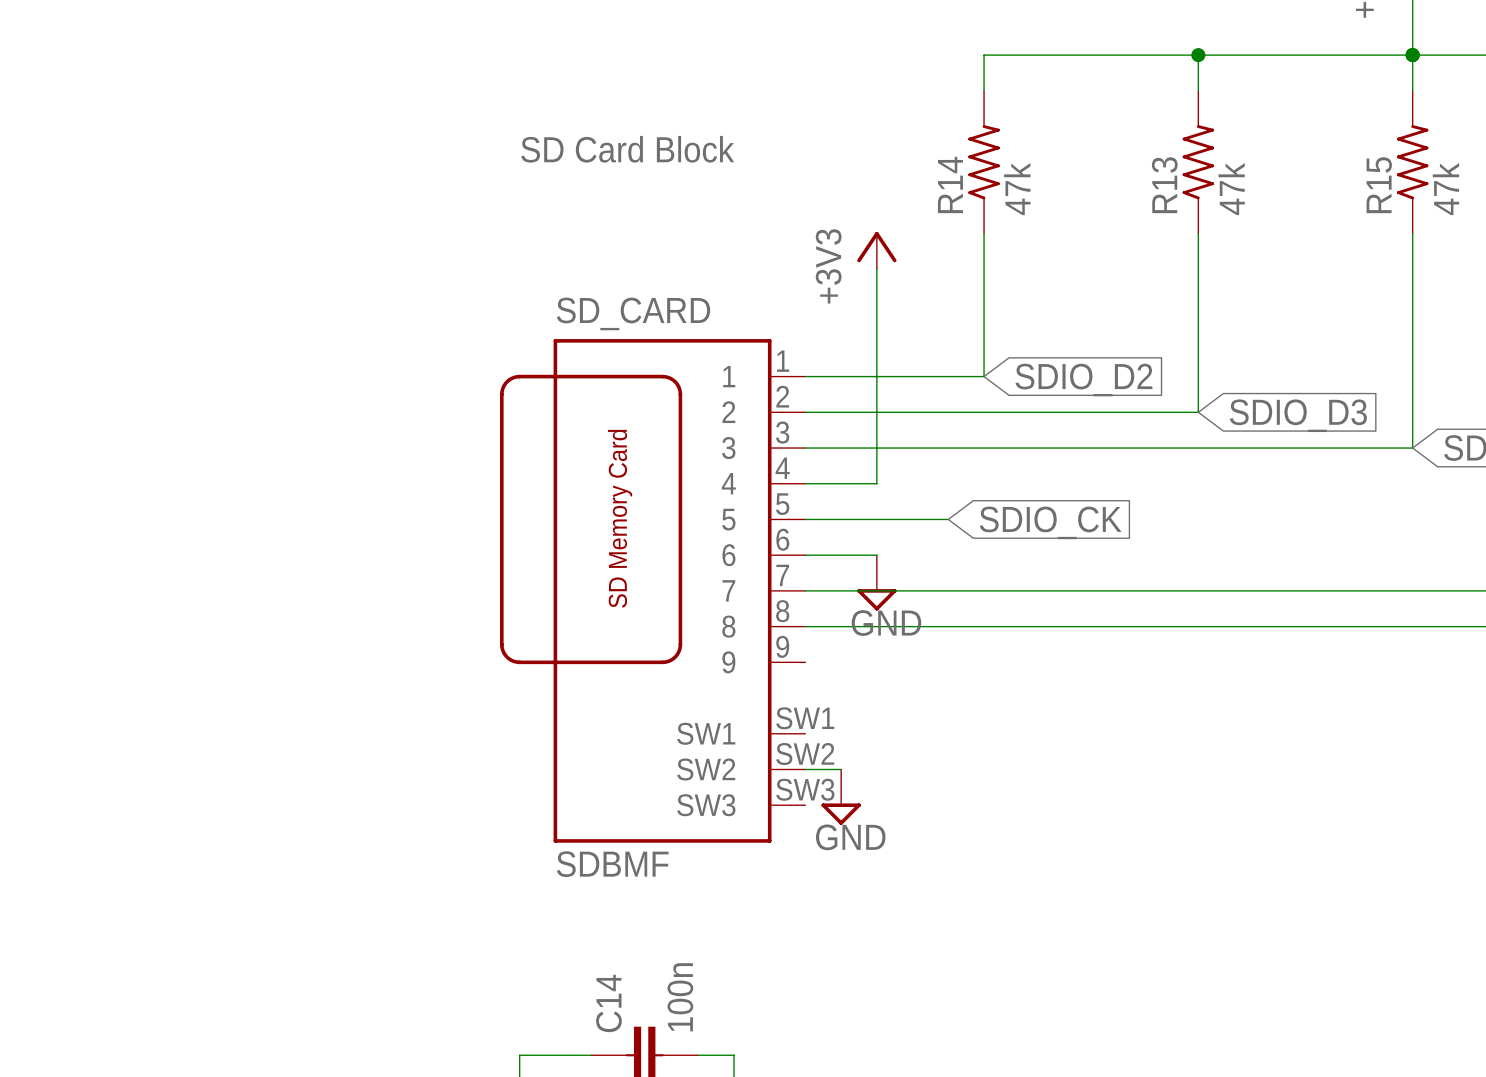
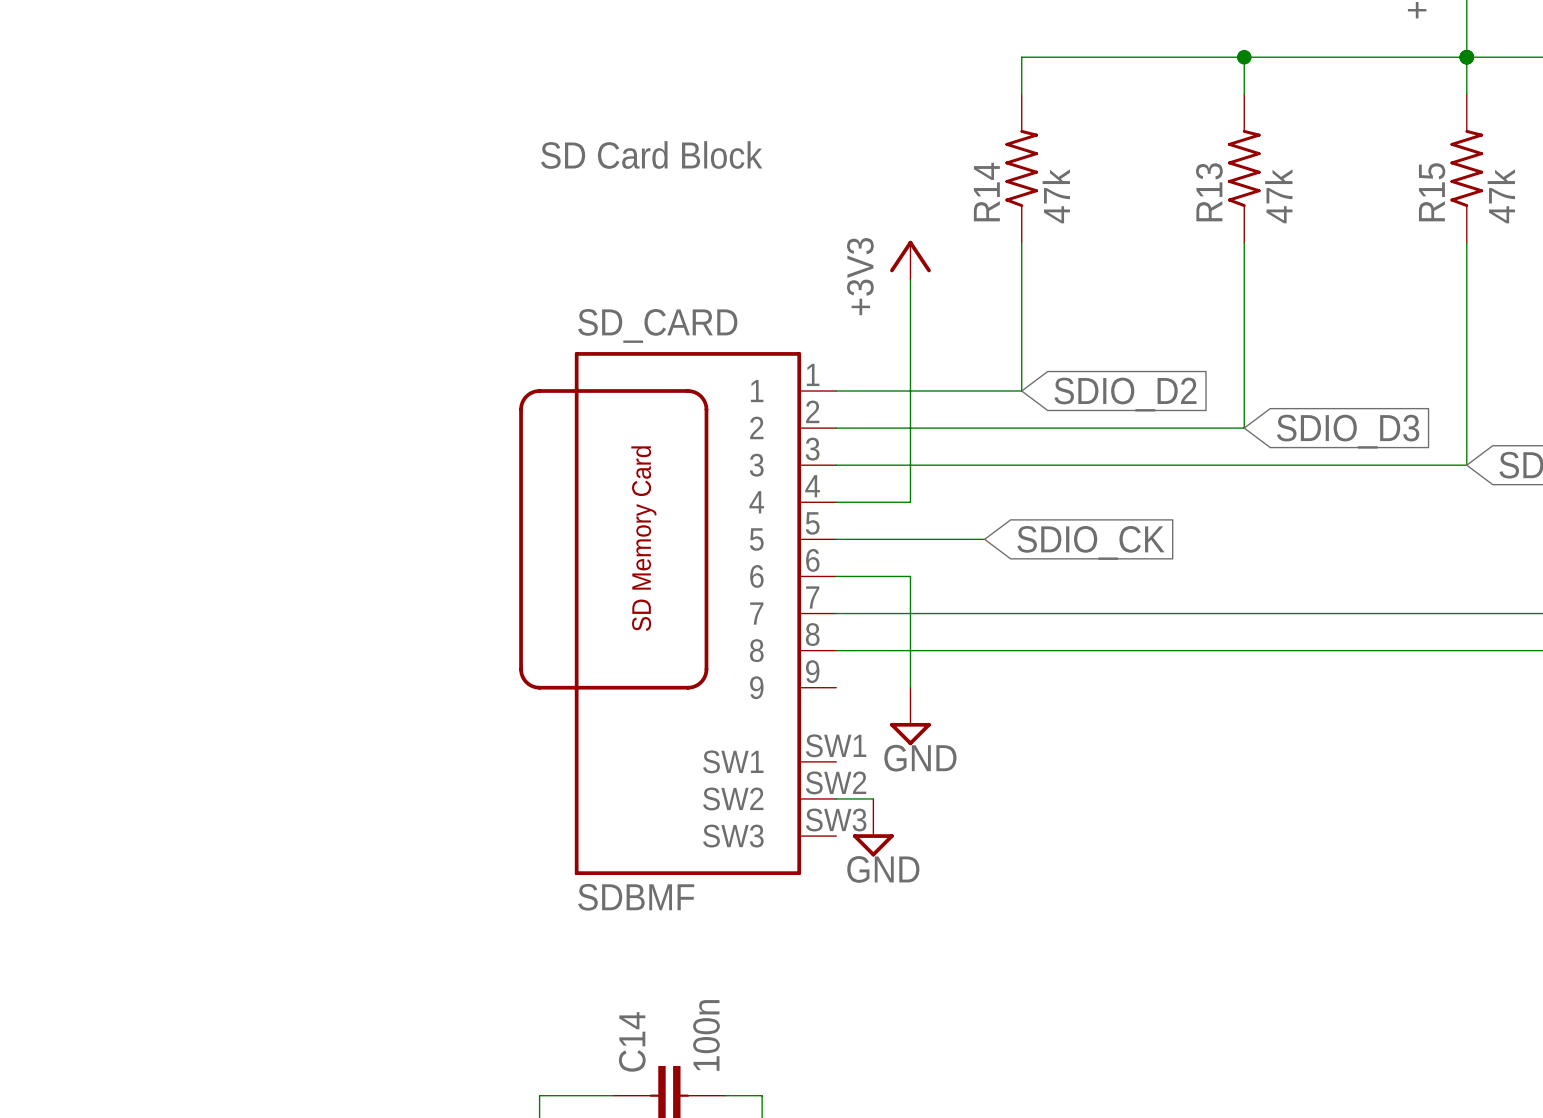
wire: none -> (910, 576) (910, 687)
power symbol position: GND (876, 582) -> GND (910, 716)

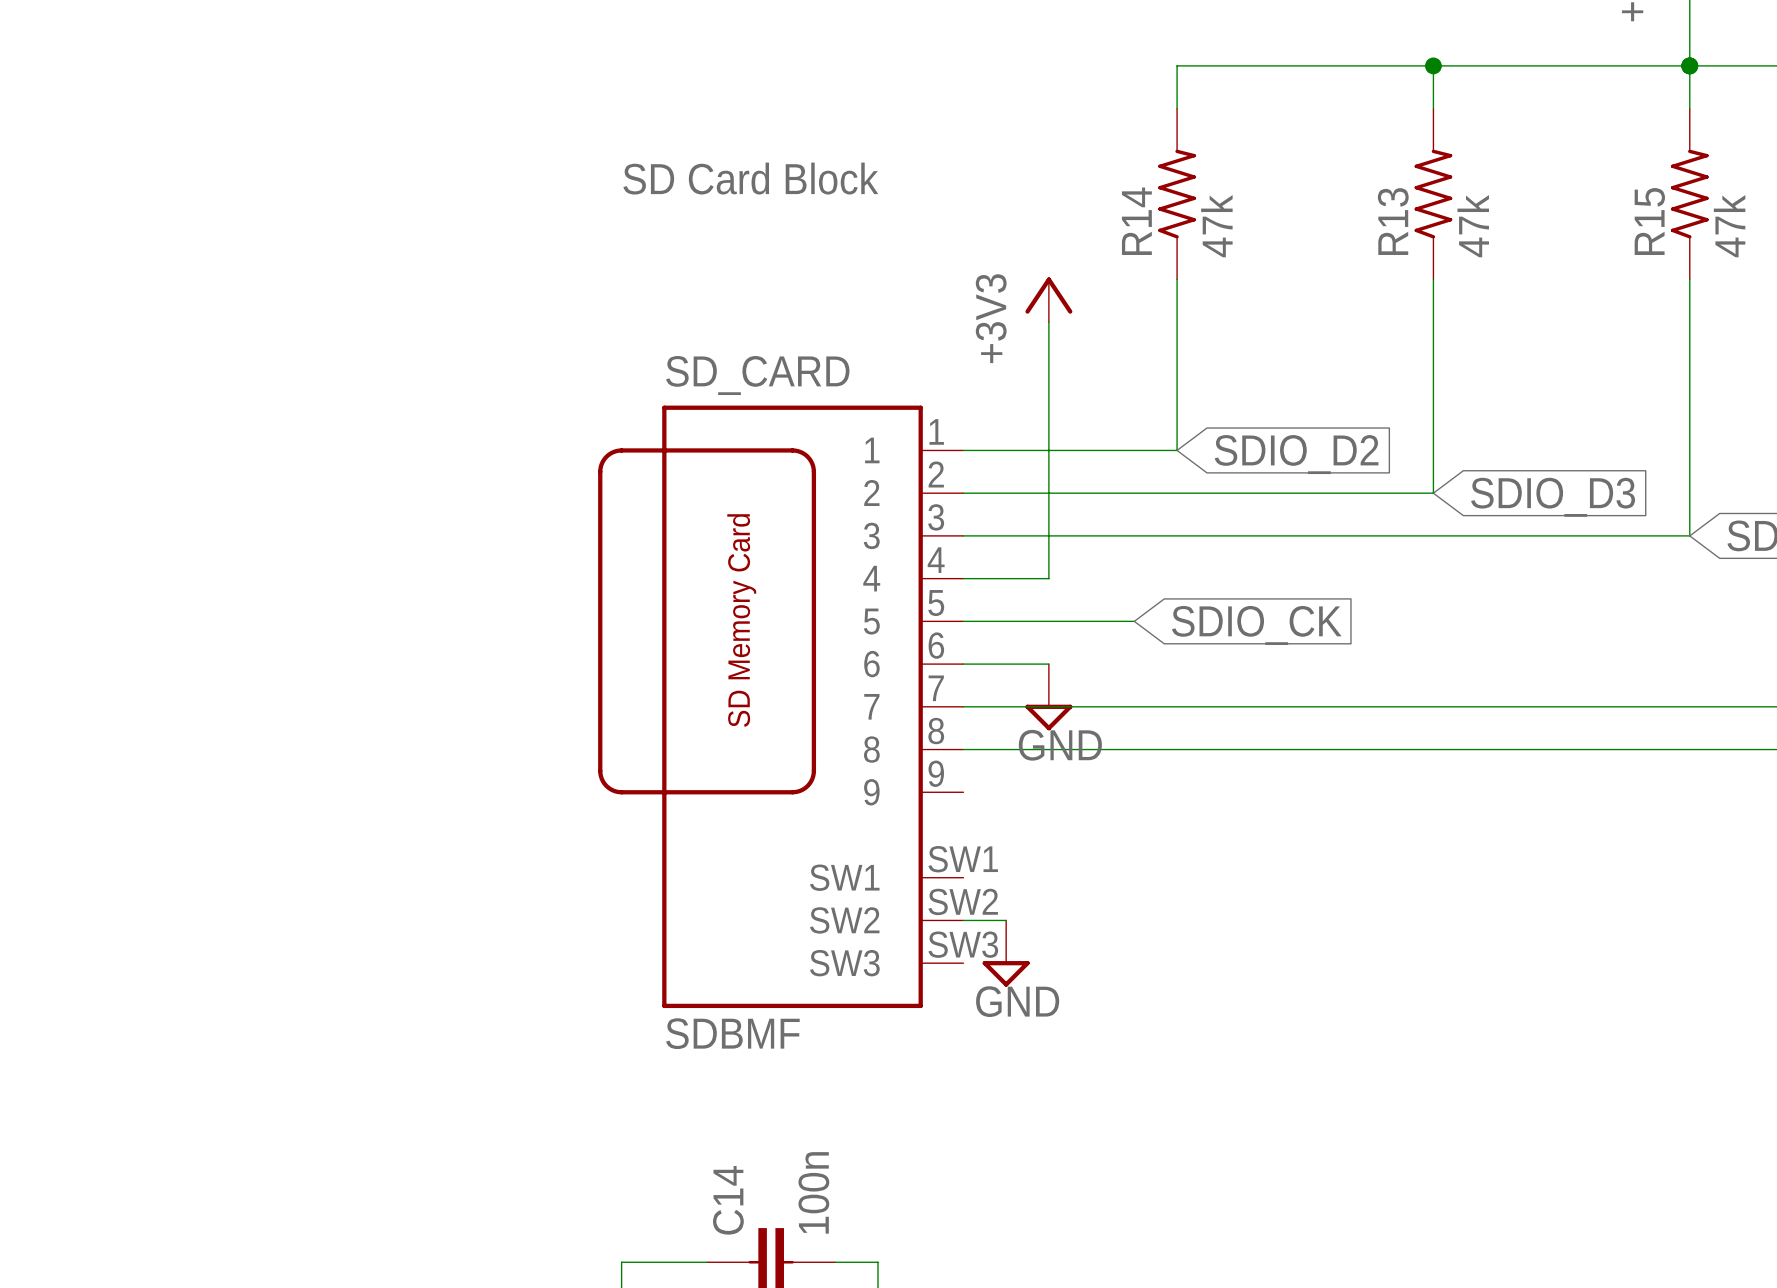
wire: (910, 576) (910, 687) -> none
power symbol position: GND (910, 716) -> GND (1048, 697)

